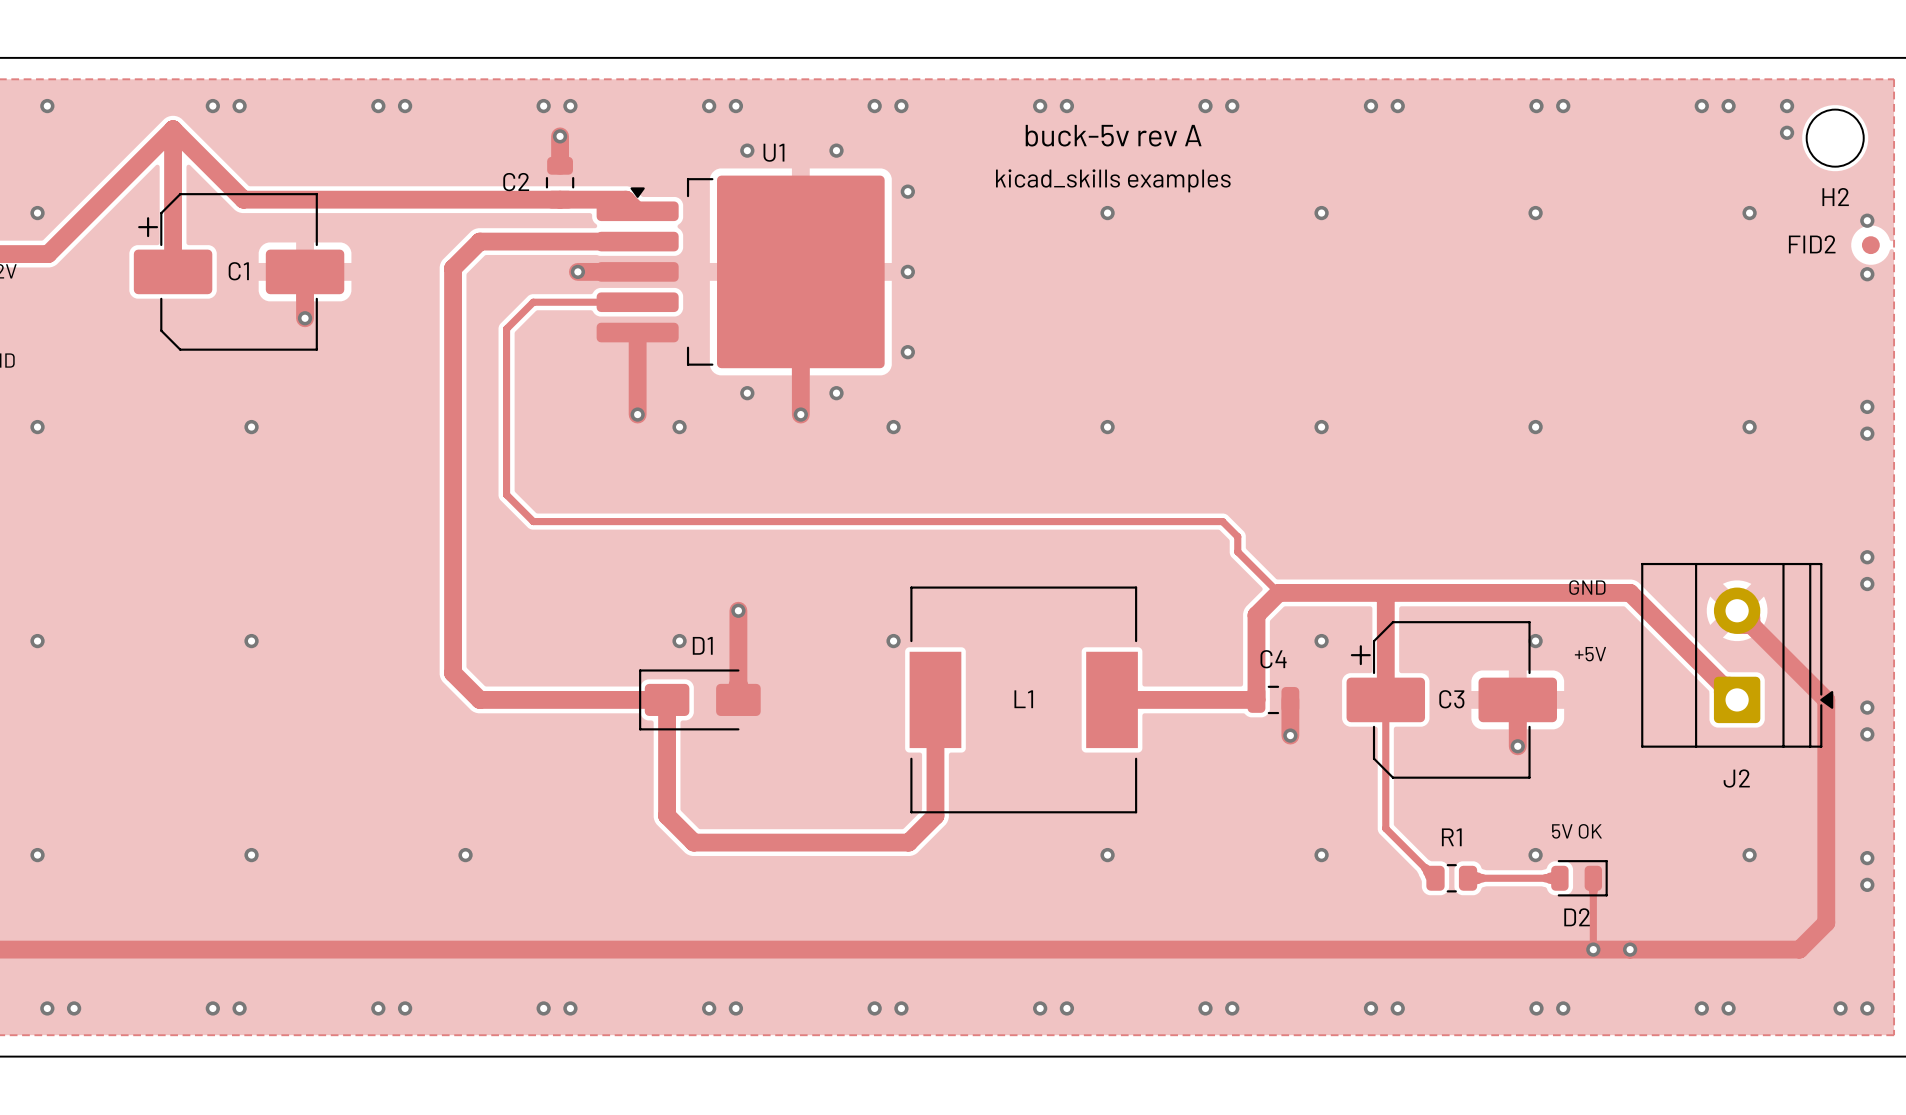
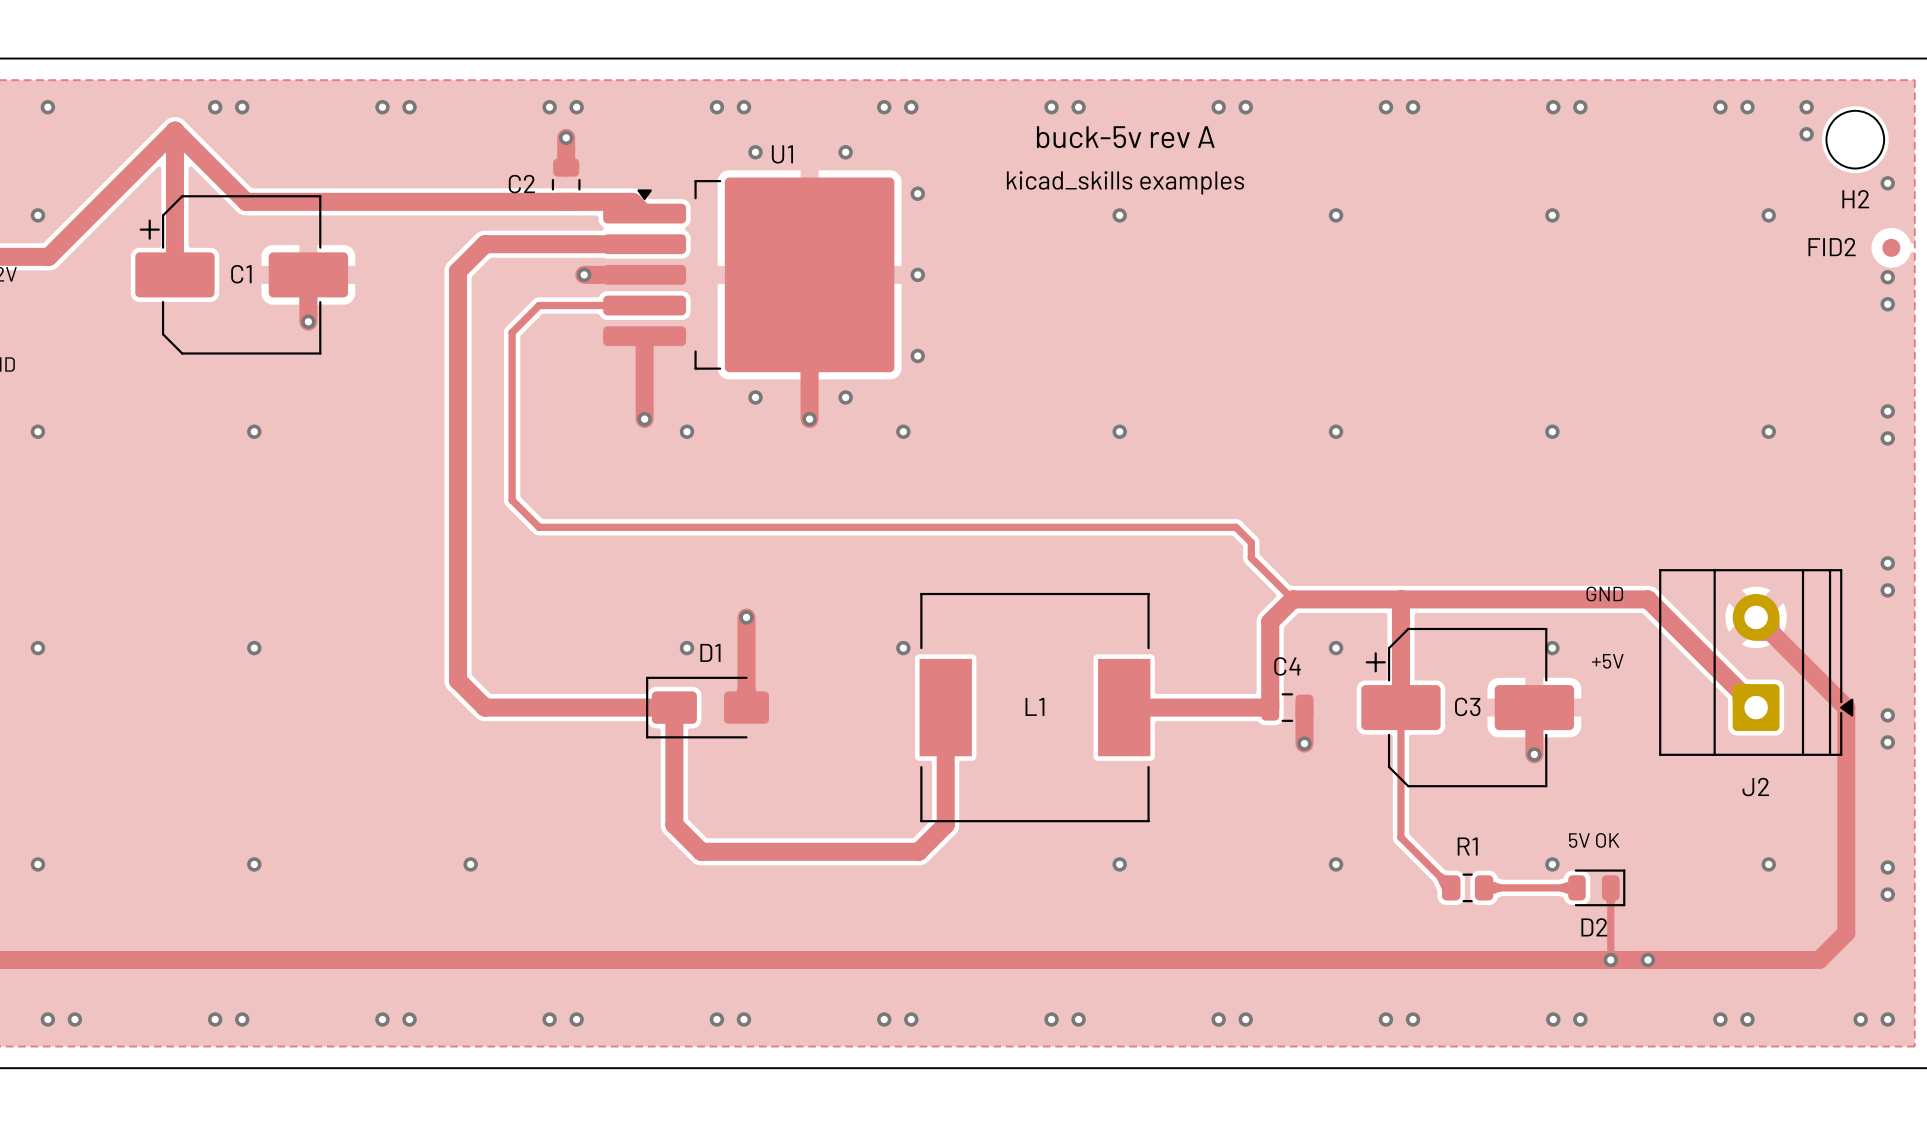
via position: (1867, 220) -> (1887, 183)
via: none -> (1887, 304)

